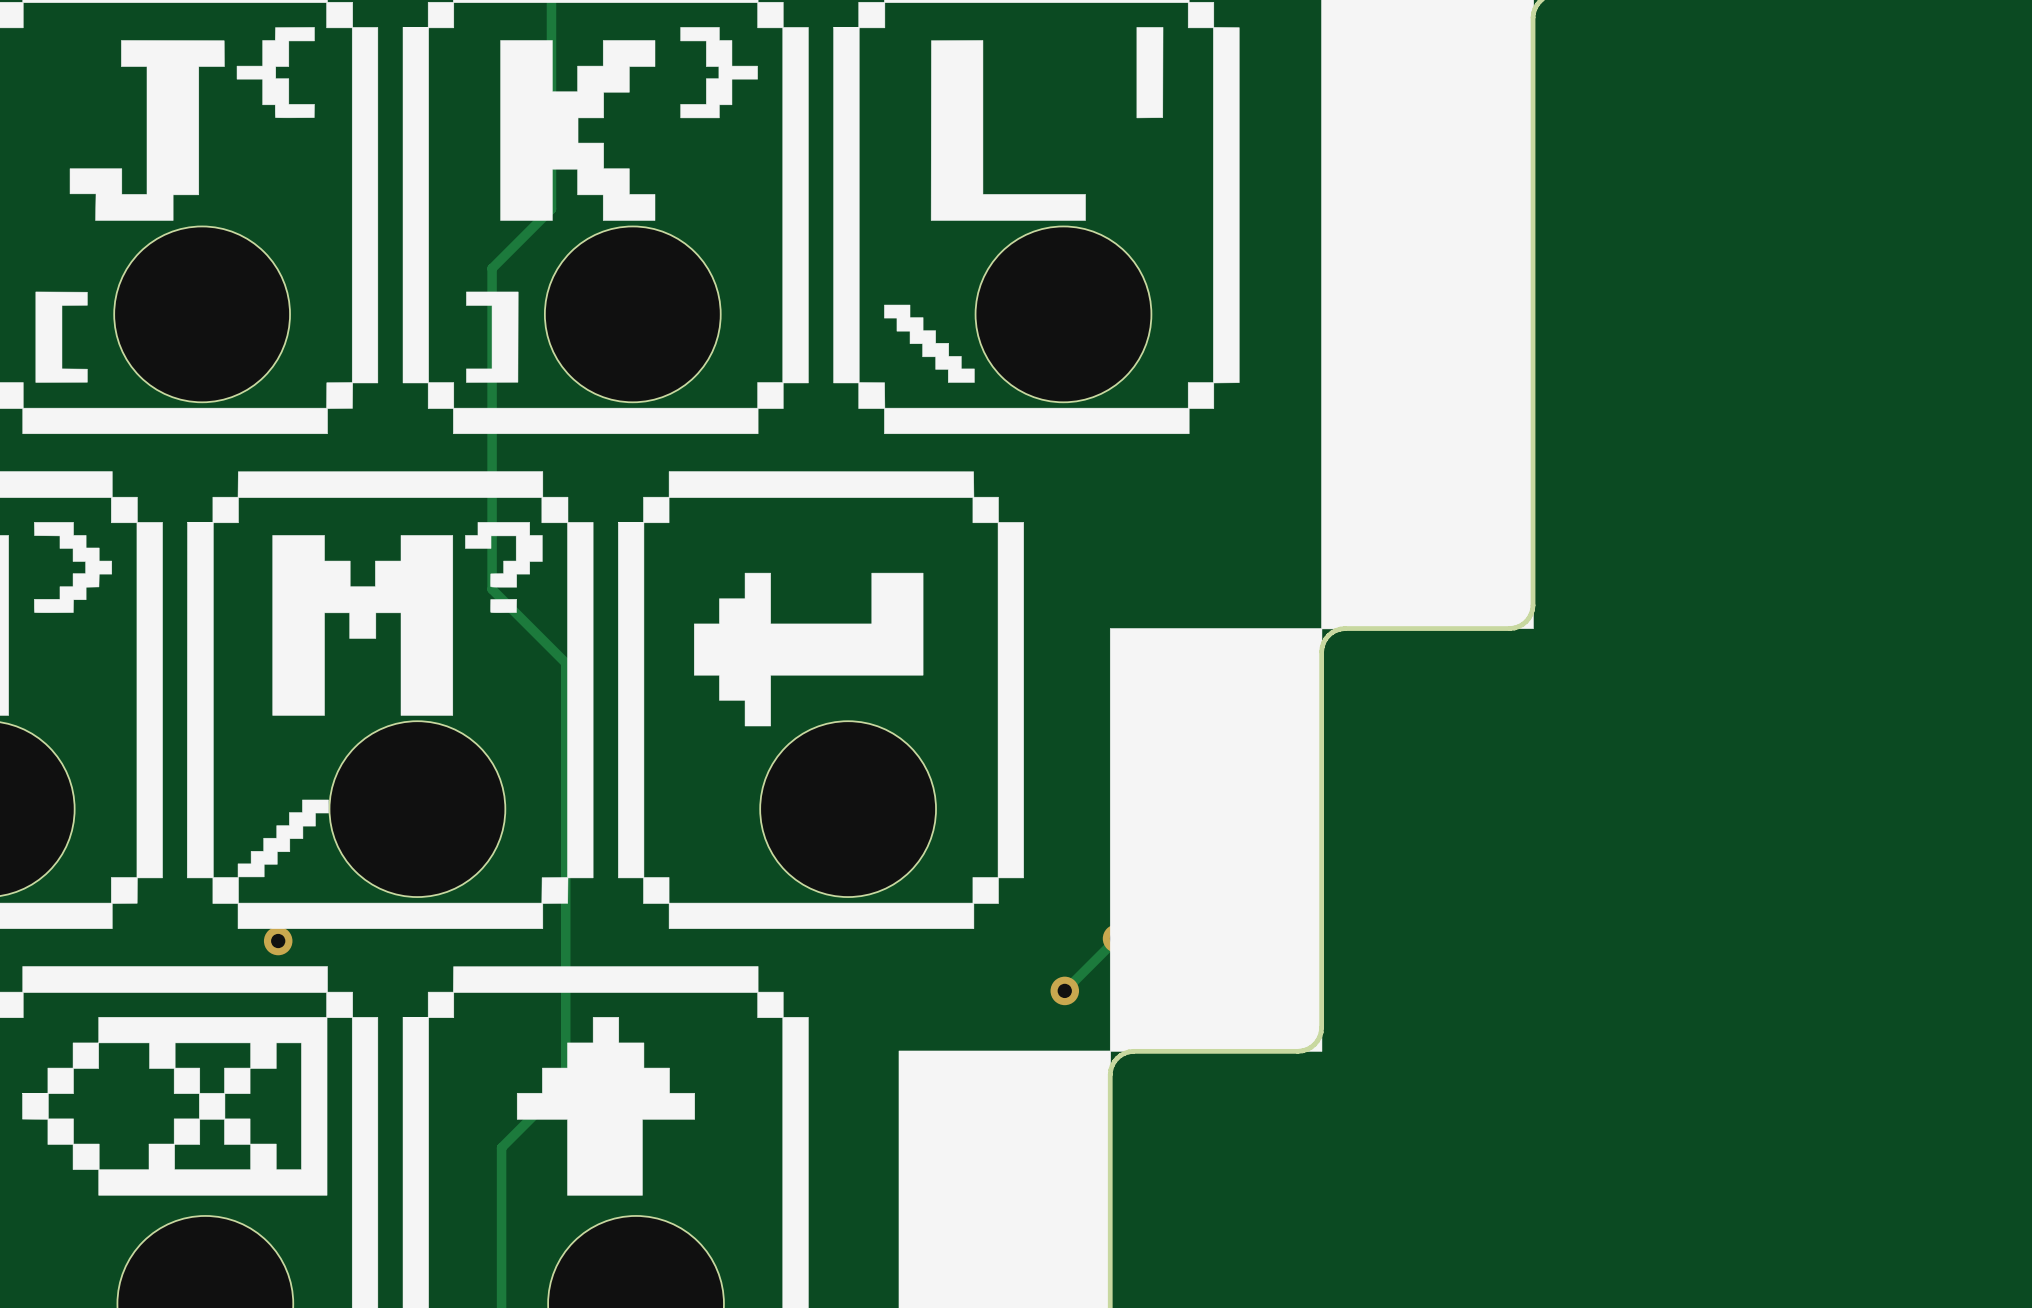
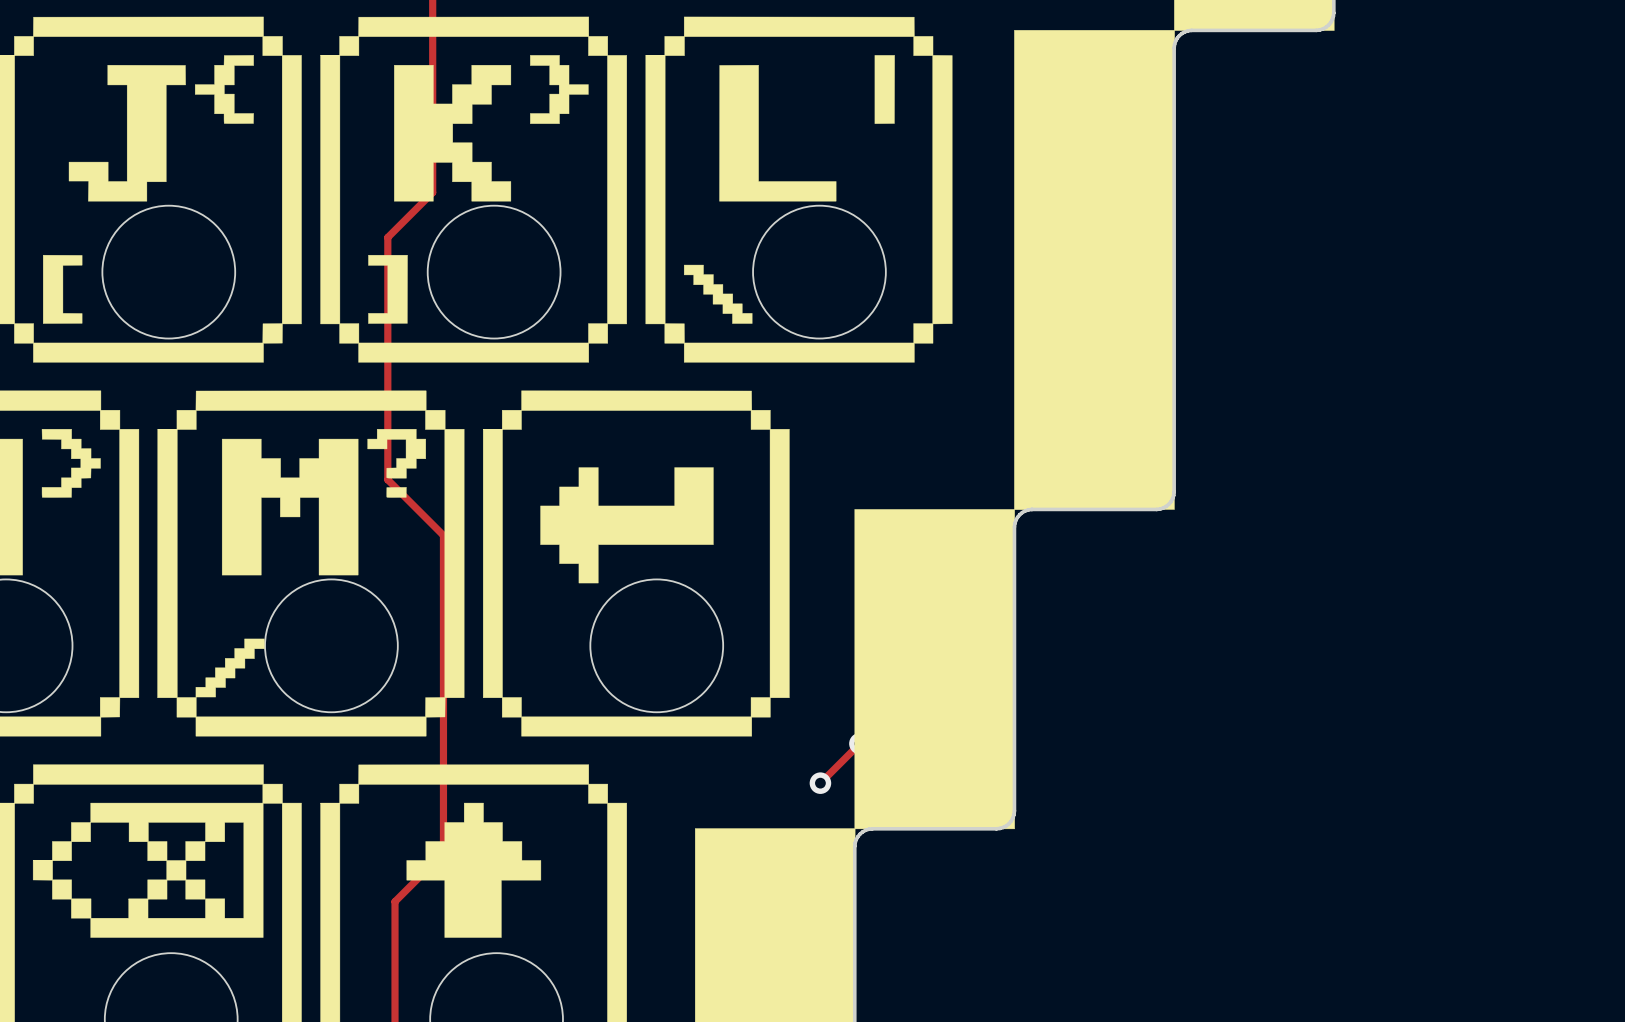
via: (278, 941) -> none

